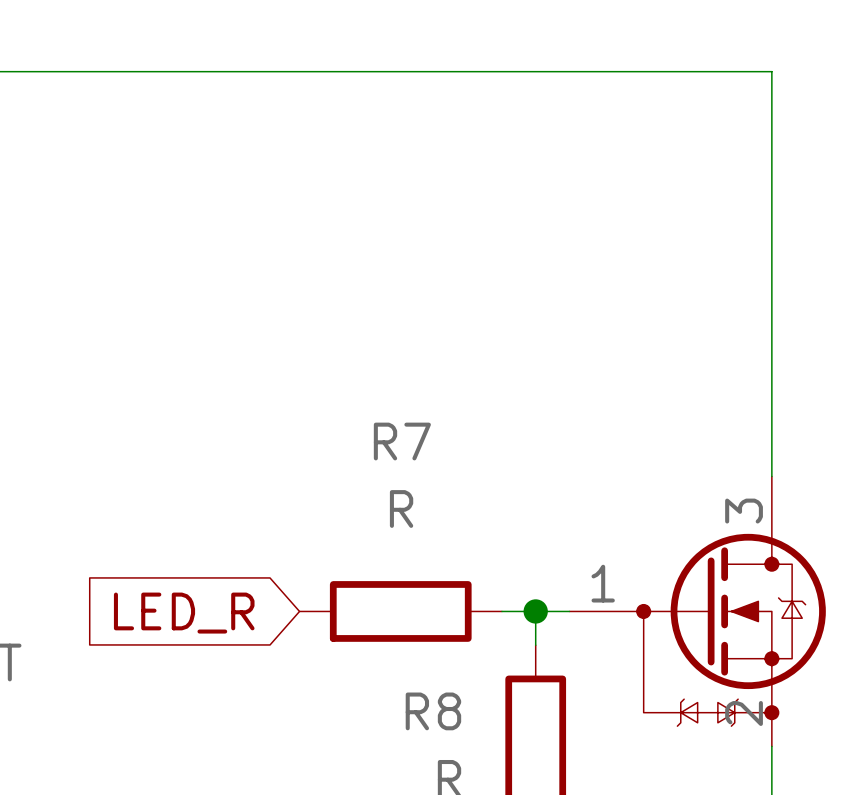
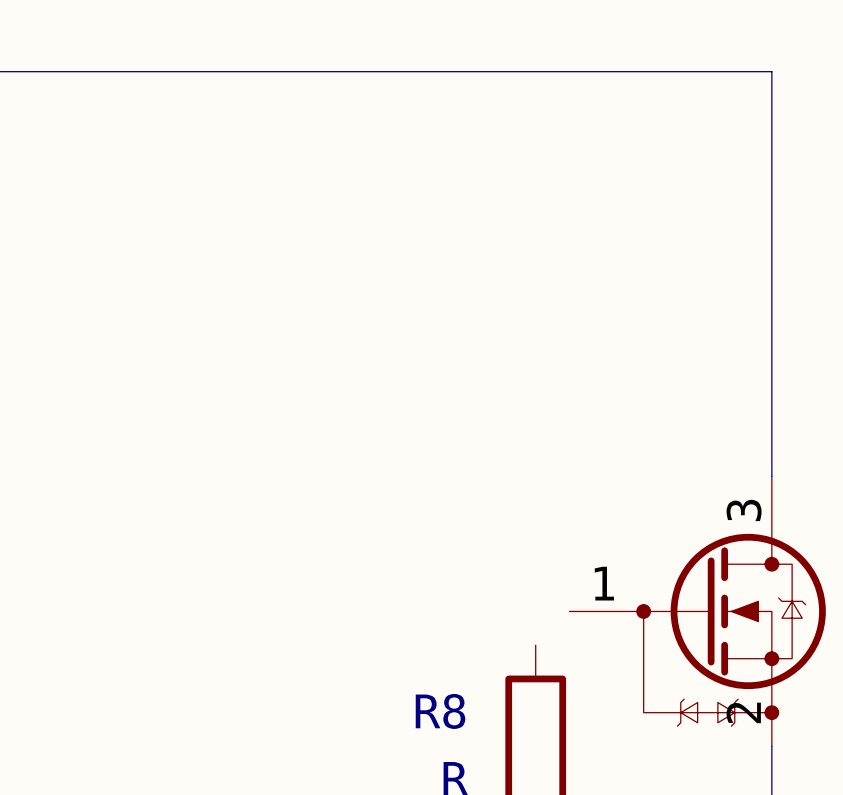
R7: R (400, 611) -> none
wire: (501, 611) (569, 611) -> none
wire: (535, 611) (535, 645) -> none
junction: (535, 611) -> none
global label: LED_R (184, 613) -> none

